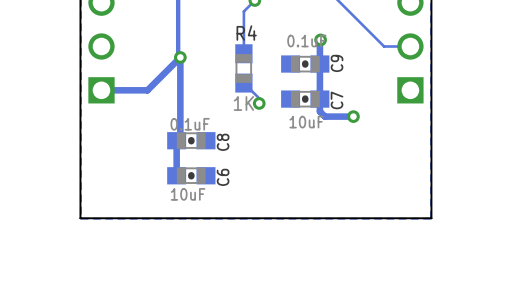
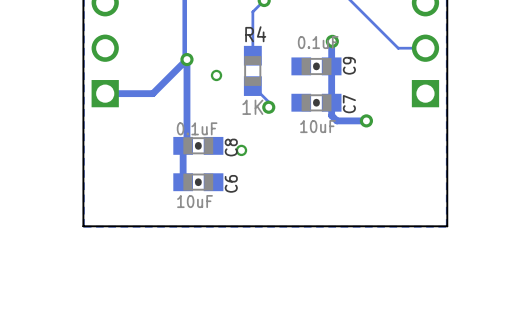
via: none -> (216, 75)
via: none -> (241, 150)

